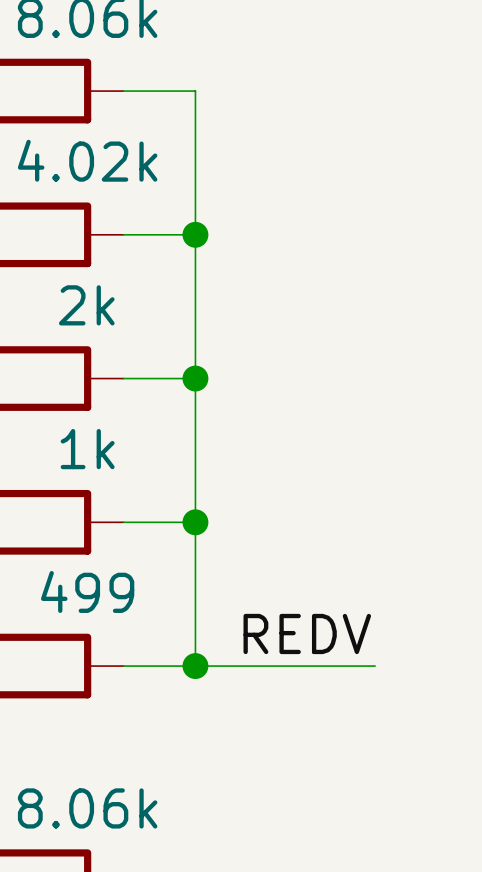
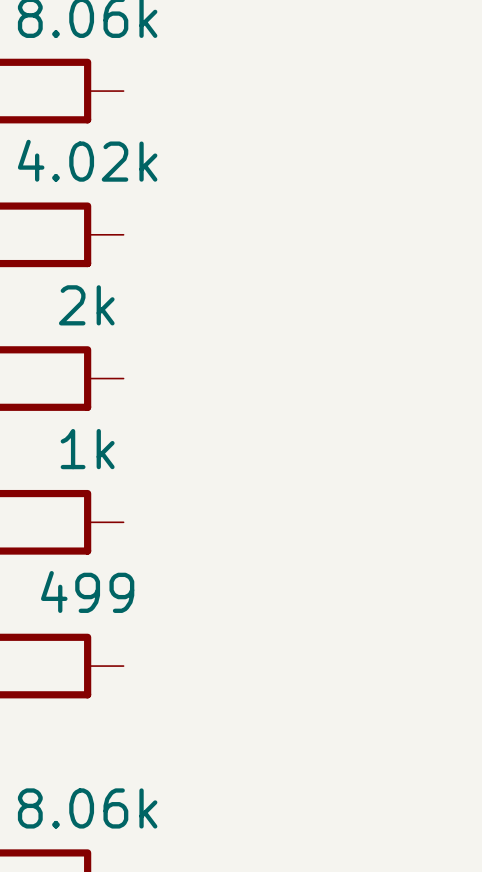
wire: (123, 91) (195, 91) (195, 666) -> none
wire: (123, 234) (195, 234) -> none
junction: (195, 234) -> none
wire: (123, 378) (195, 378) -> none
junction: (195, 378) -> none
wire: (123, 522) (195, 522) -> none
junction: (195, 522) -> none
label: REDV (307, 633) -> none
wire: (123, 666) (375, 666) -> none
junction: (195, 666) -> none

